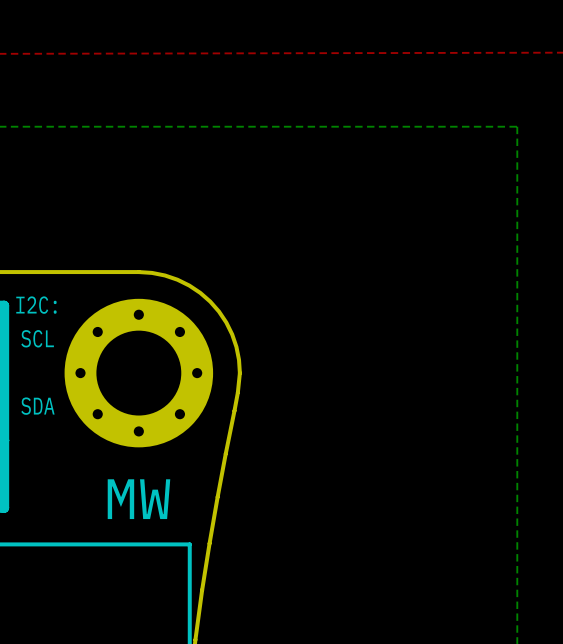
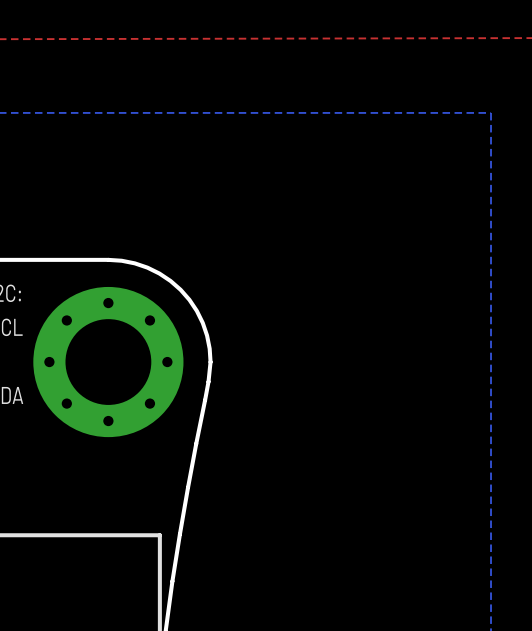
text: MW (138, 499) -> none

